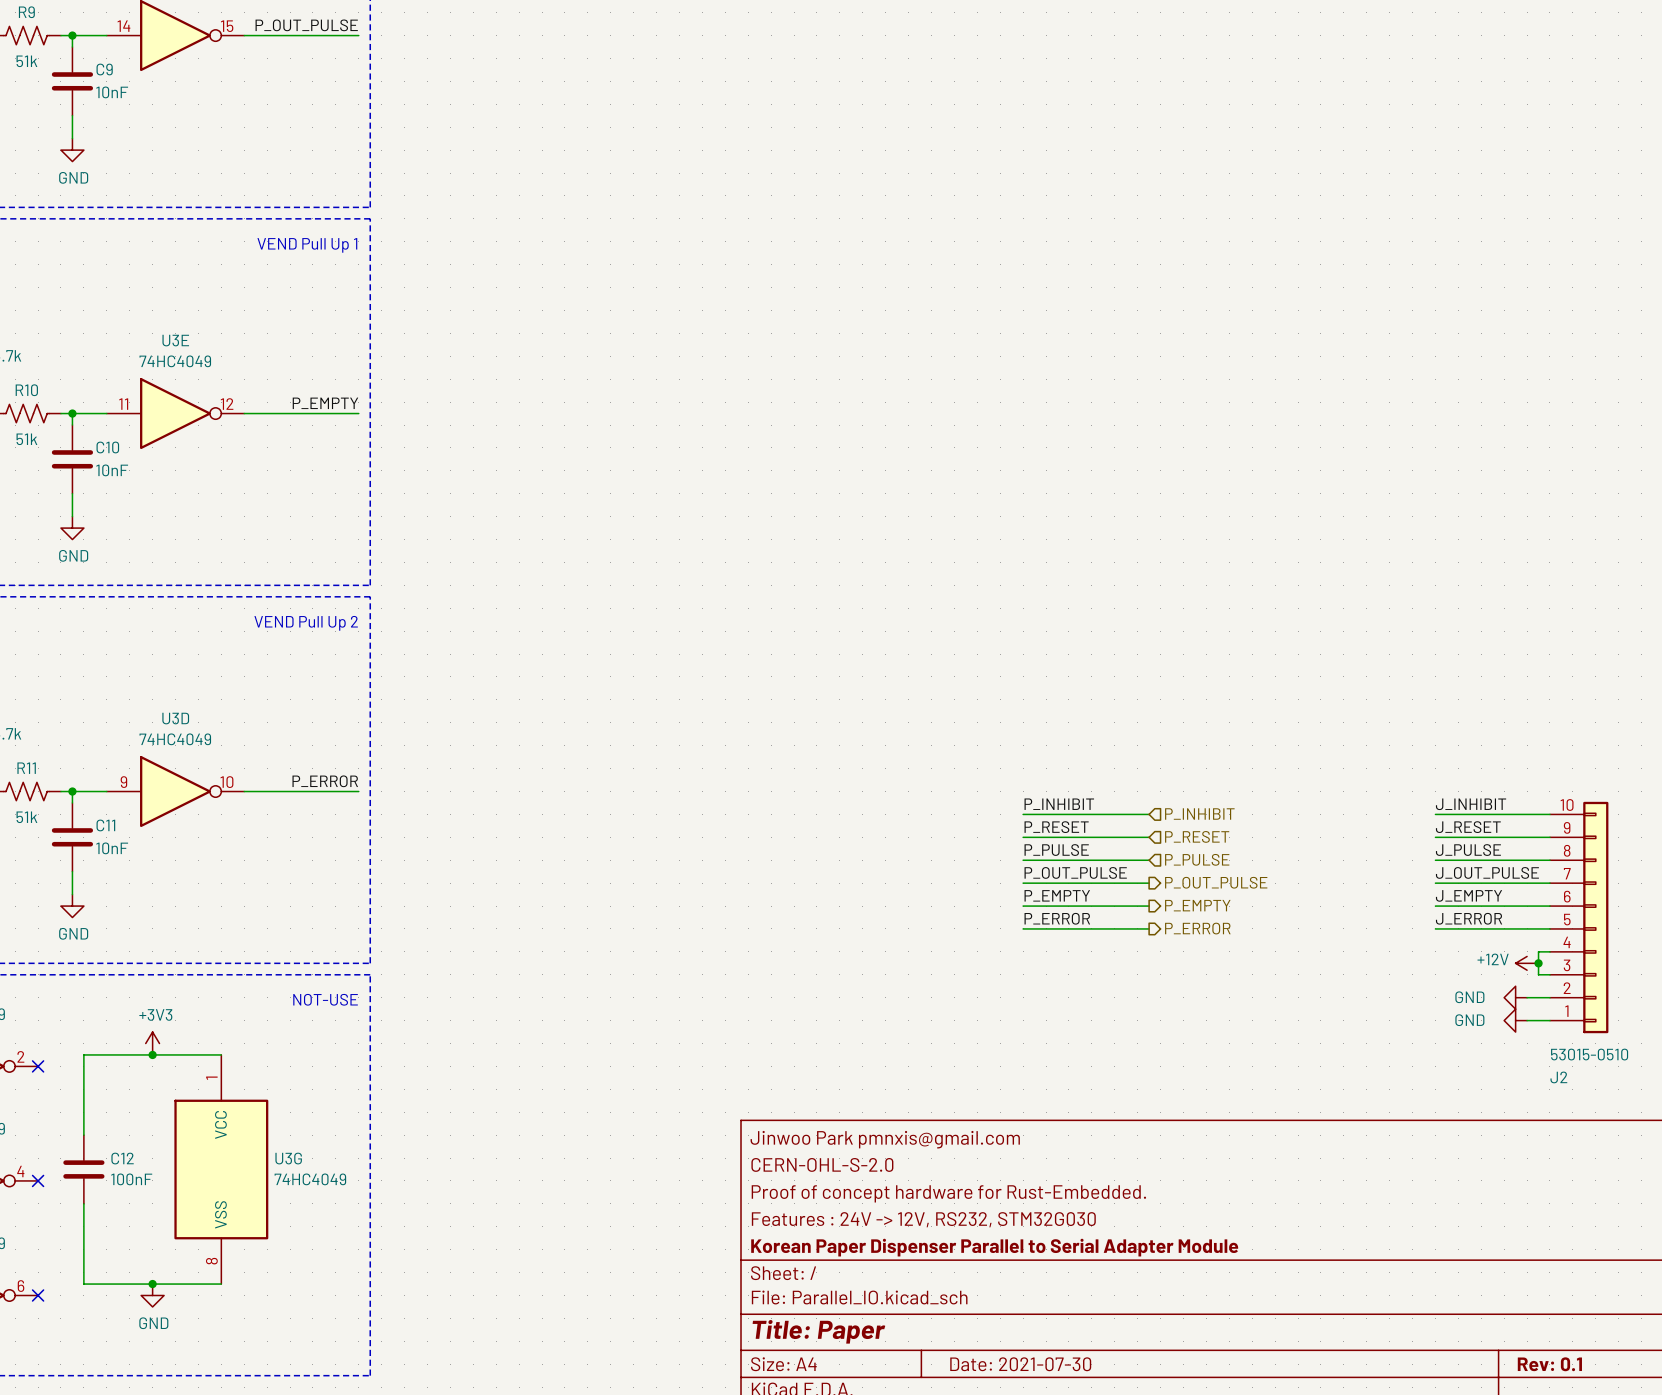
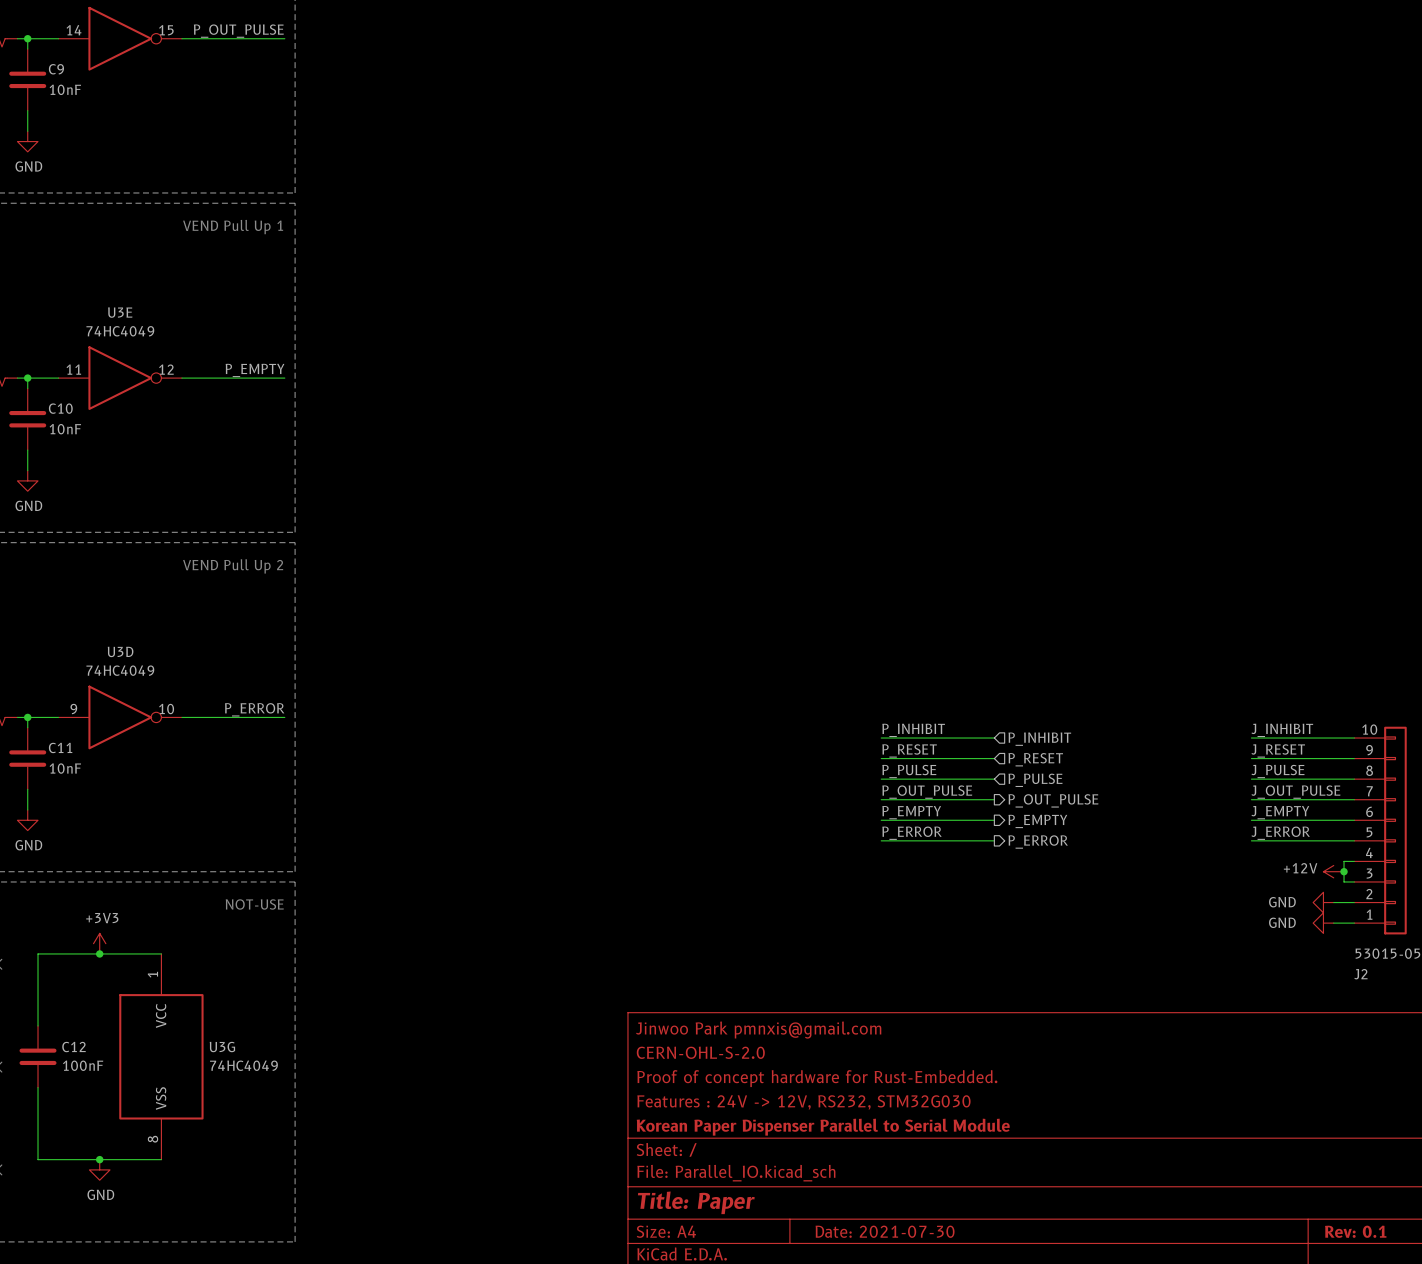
title block: Korean Paper Dispenser Parallel to Serial Adapter Module (994, 1247) -> Korean Paper Dispenser Parallel to Serial Module (823, 1127)

